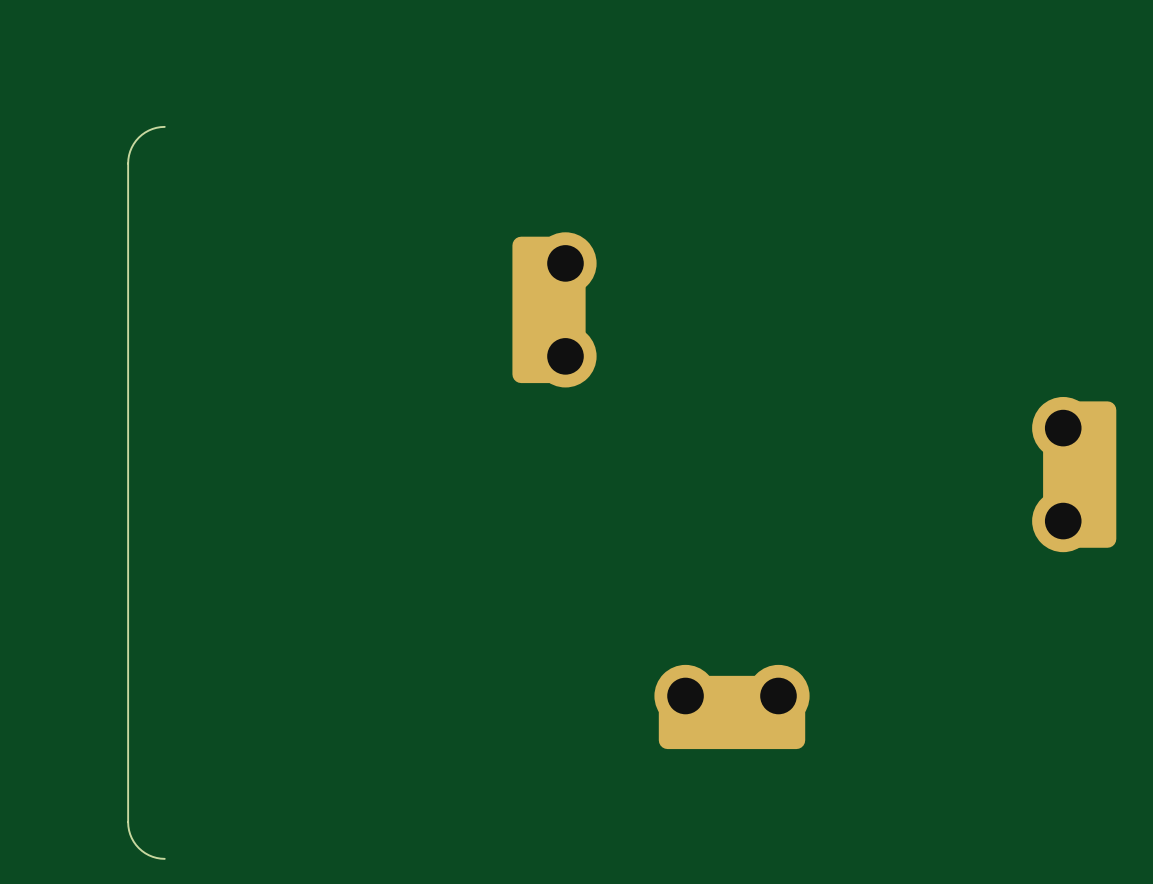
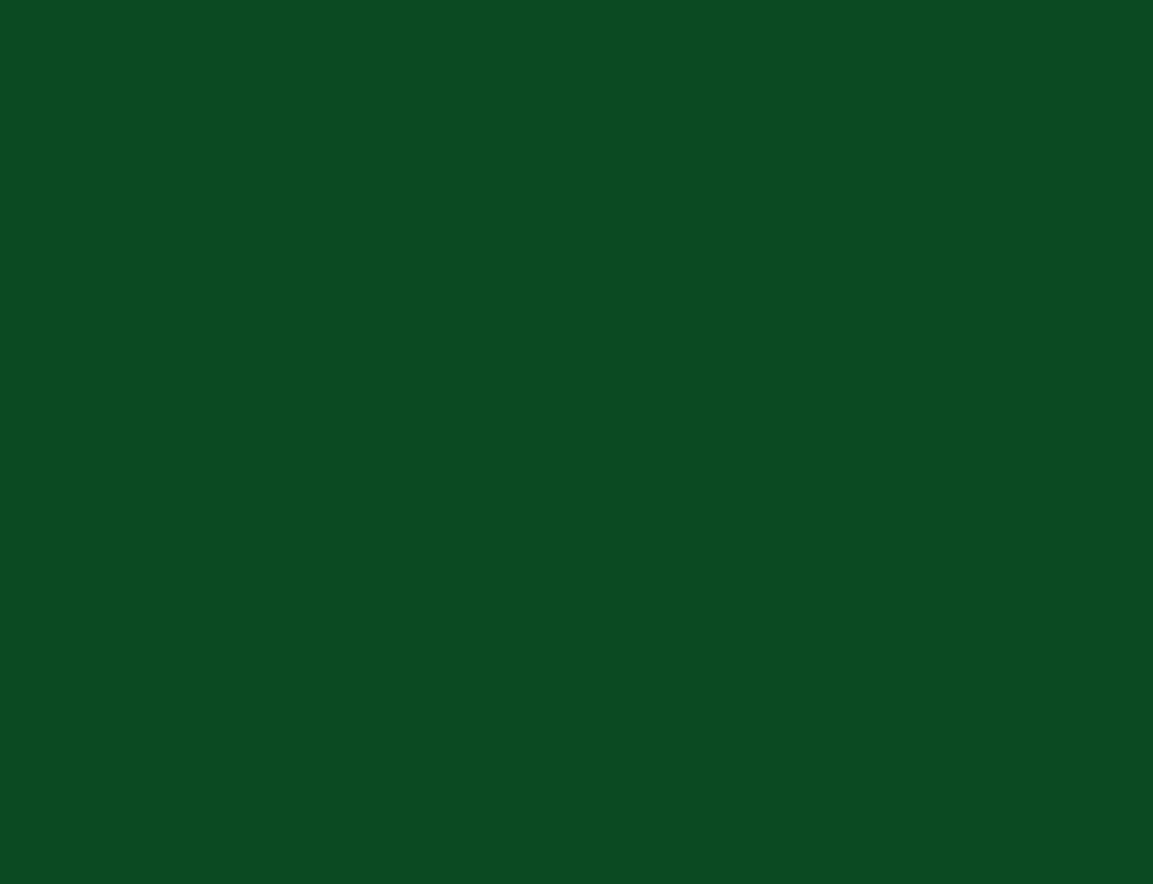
board edge: (164, 126) (152, 128) (138, 137) (130, 151) (128, 163) (128, 822) (130, 834) (138, 848) (152, 856) (164, 858) -> none
part: (554, 309) -> none
part: (1074, 474) -> none
part: (732, 706) -> none

